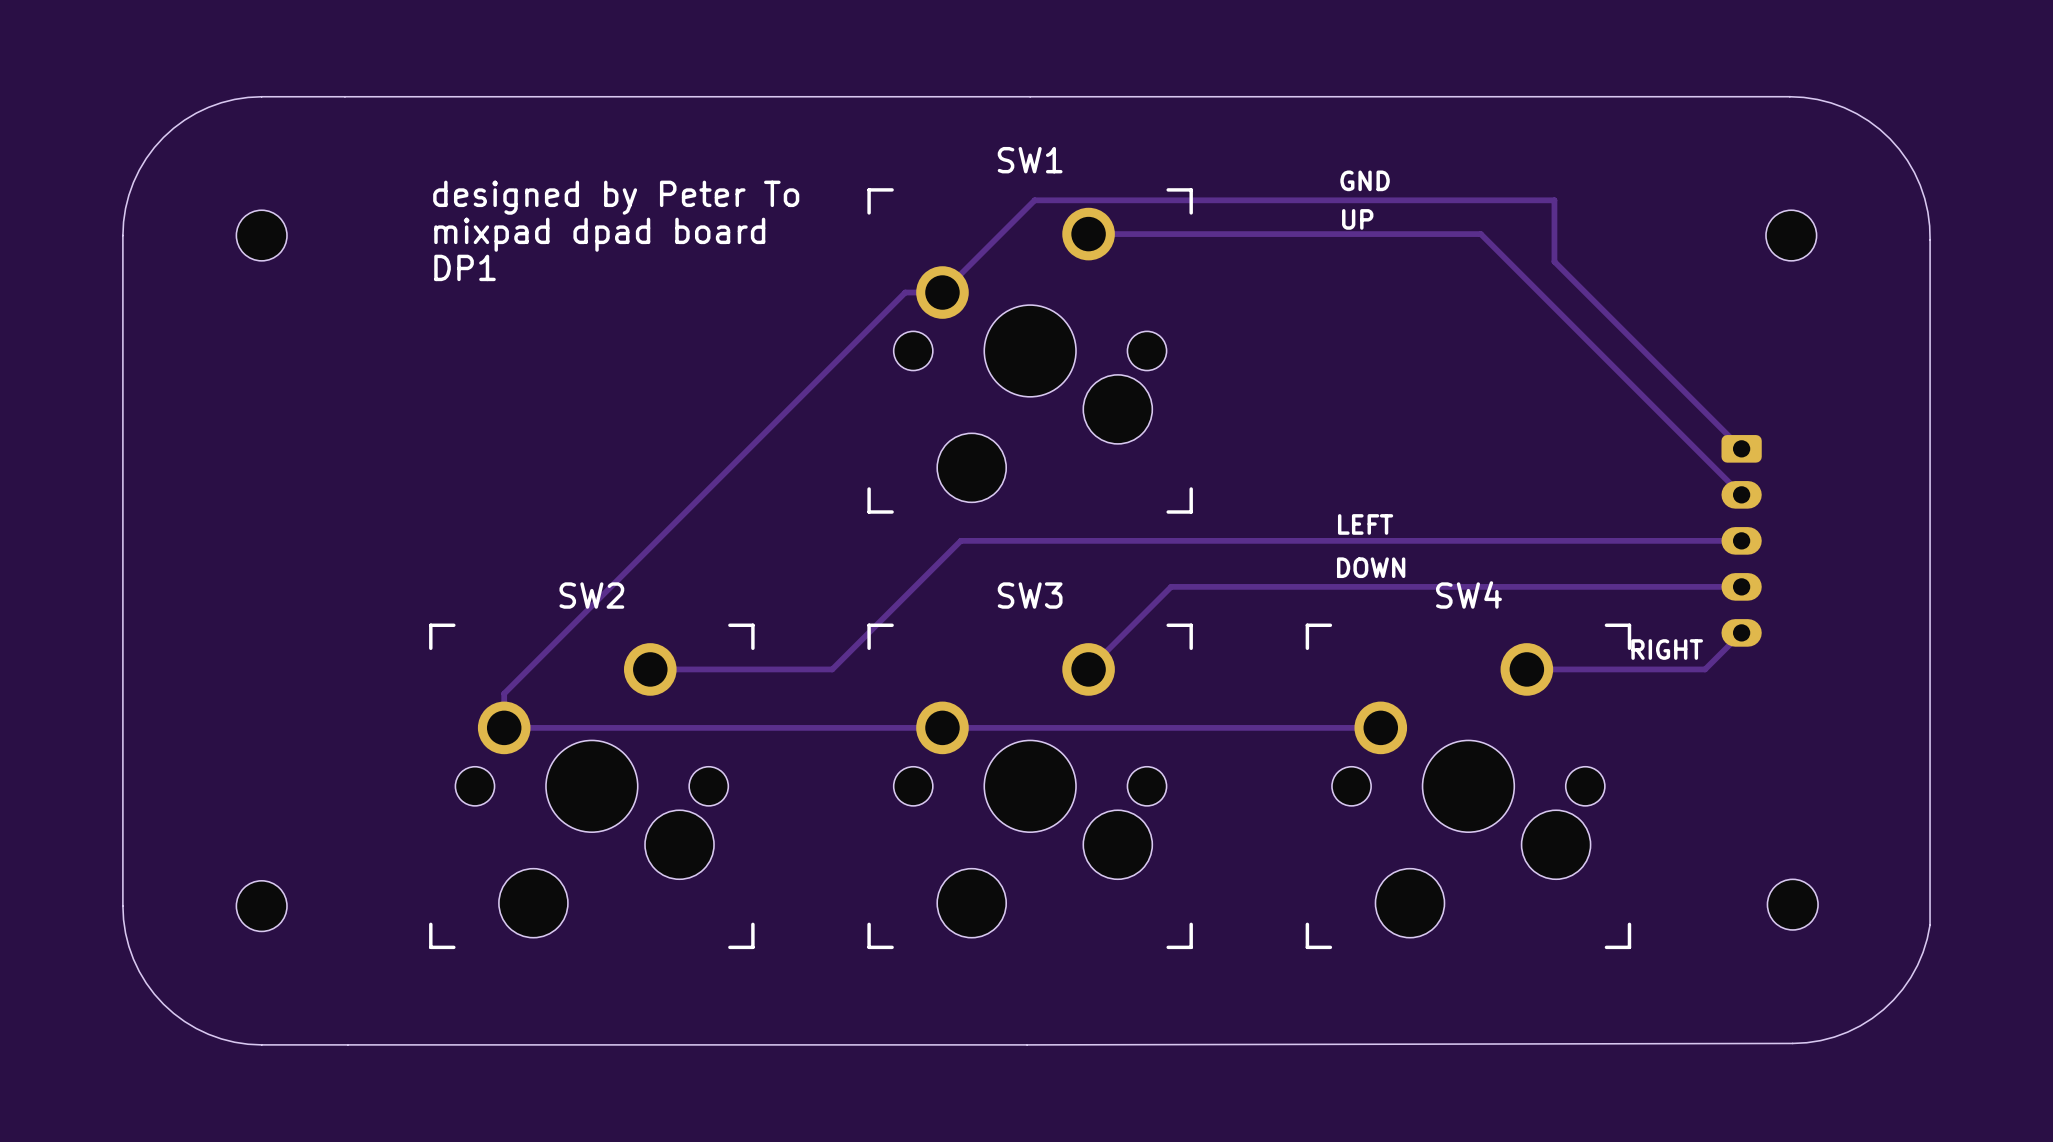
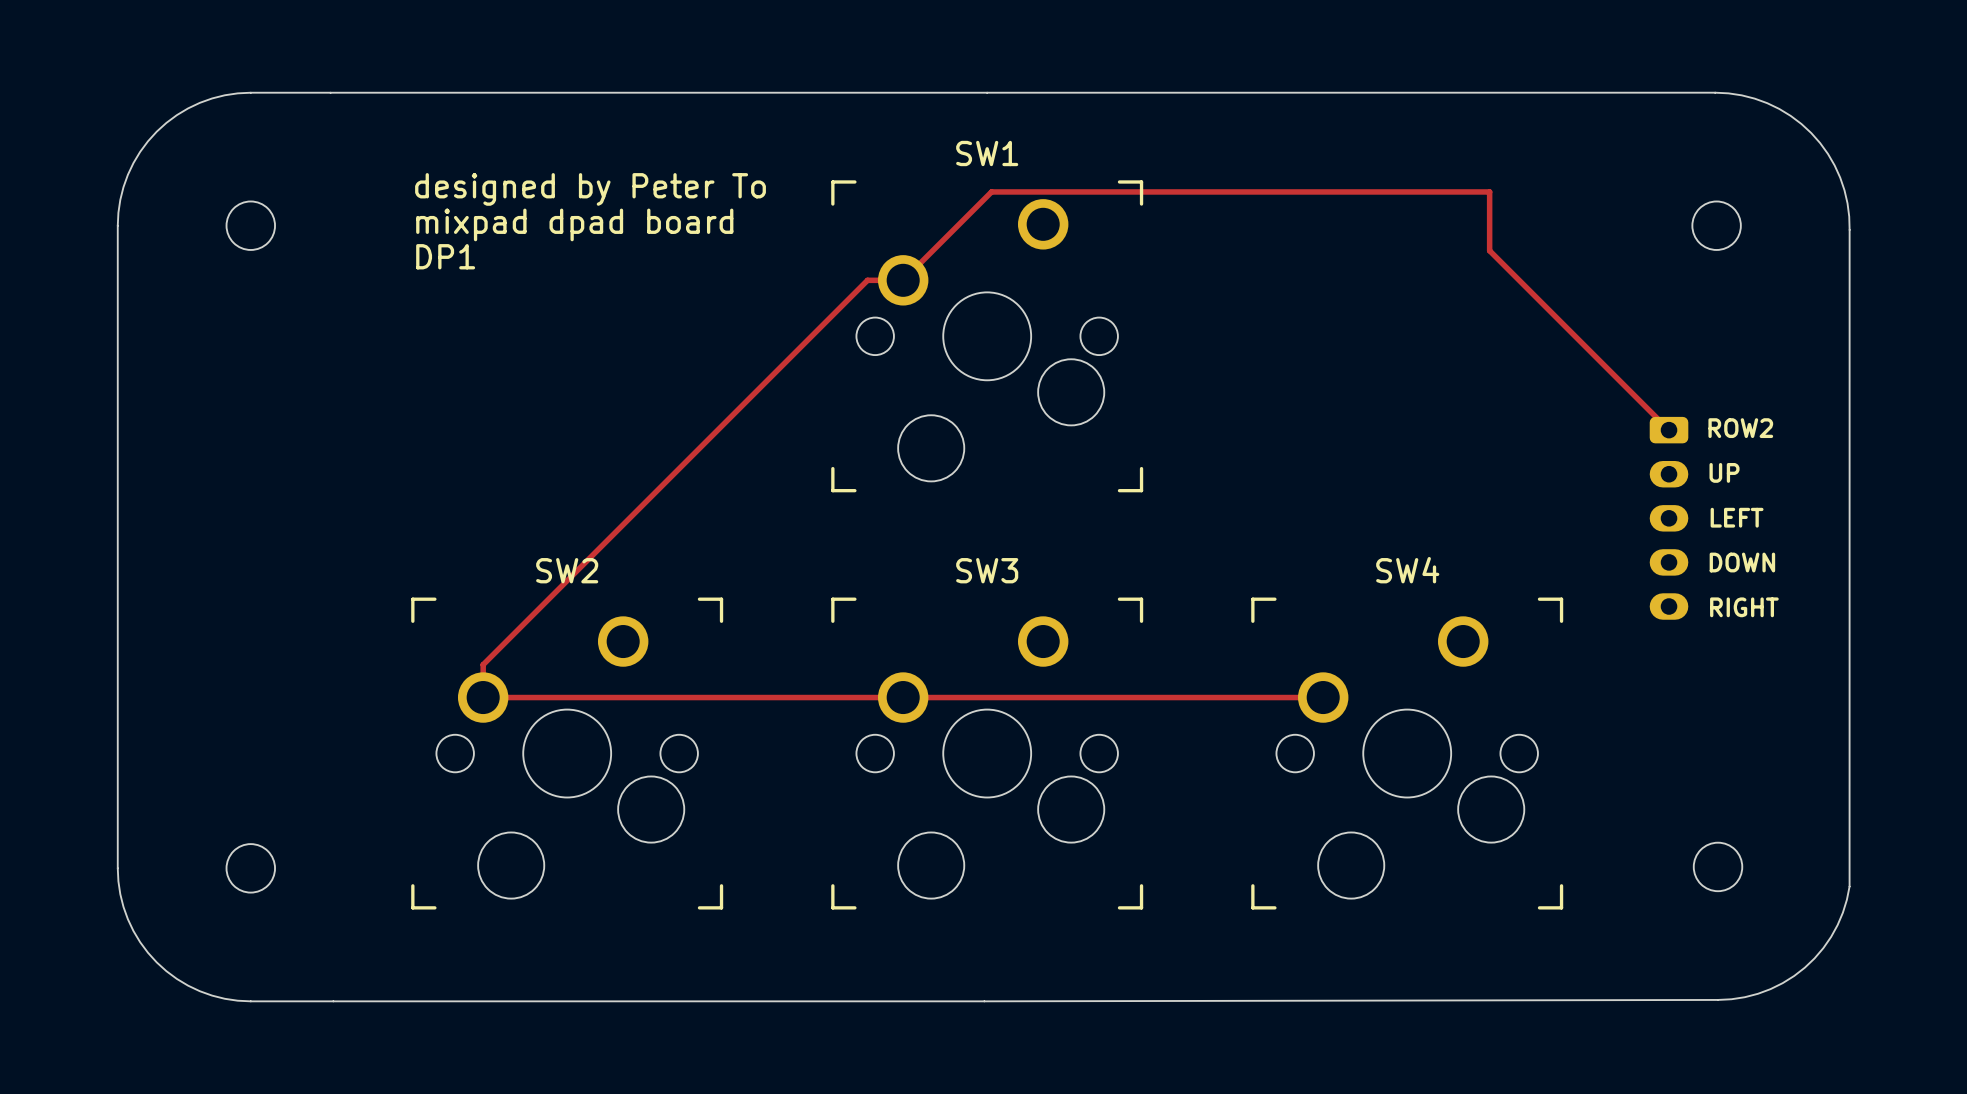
text: GND (1365, 180) -> none
text position: UP (1357, 219) -> UP (1724, 472)
track: (1088, 234) (1480, 234) (1741, 494) -> none
text: none -> ROW2 (1740, 428)
text position: LEFT (1365, 524) -> LEFT (1737, 517)
track: (1741, 540) (960, 540) (832, 669) (650, 669) -> none
text position: DOWN (1371, 567) -> DOWN (1742, 562)
track: (1741, 586) (1171, 586) (1088, 669) -> none
track: (1741, 632) (1705, 669) (1526, 669) -> none
text position: RIGHT (1667, 649) -> RIGHT (1744, 607)

